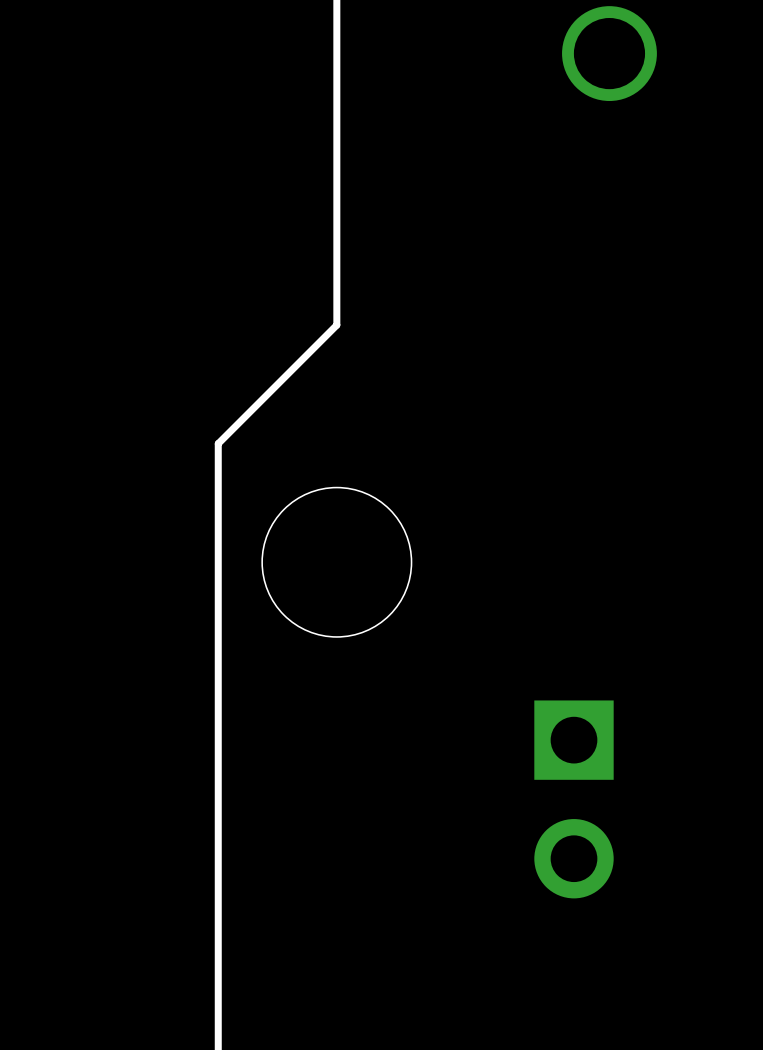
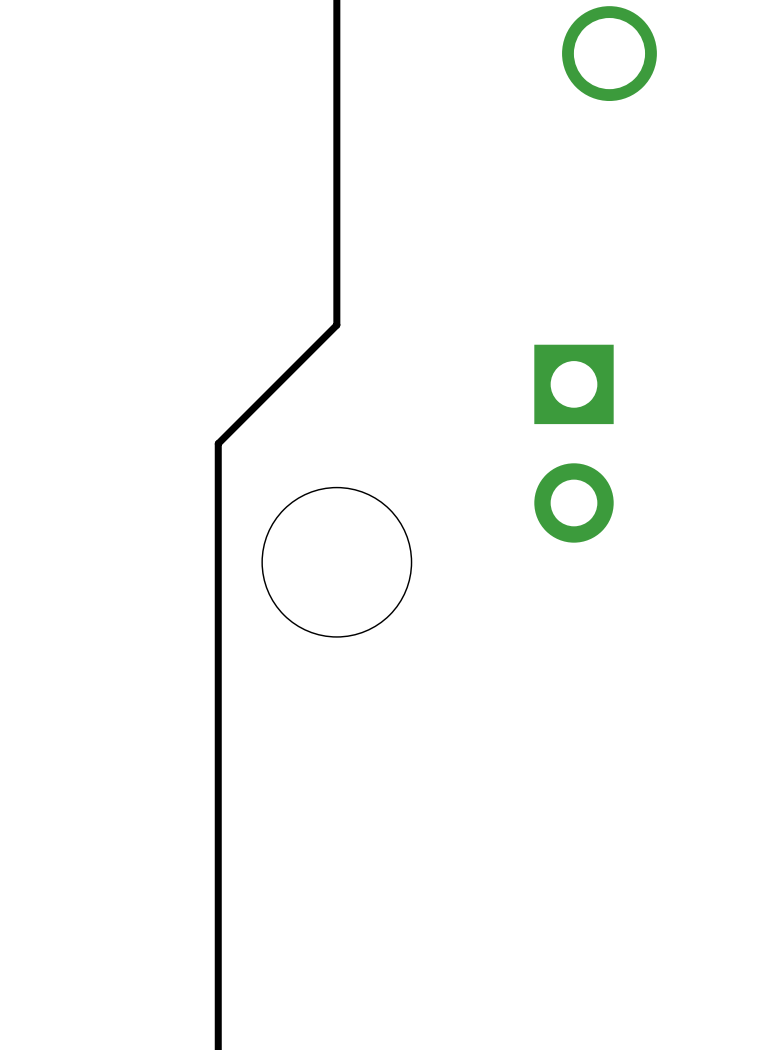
part position: (573, 799) -> (573, 443)

